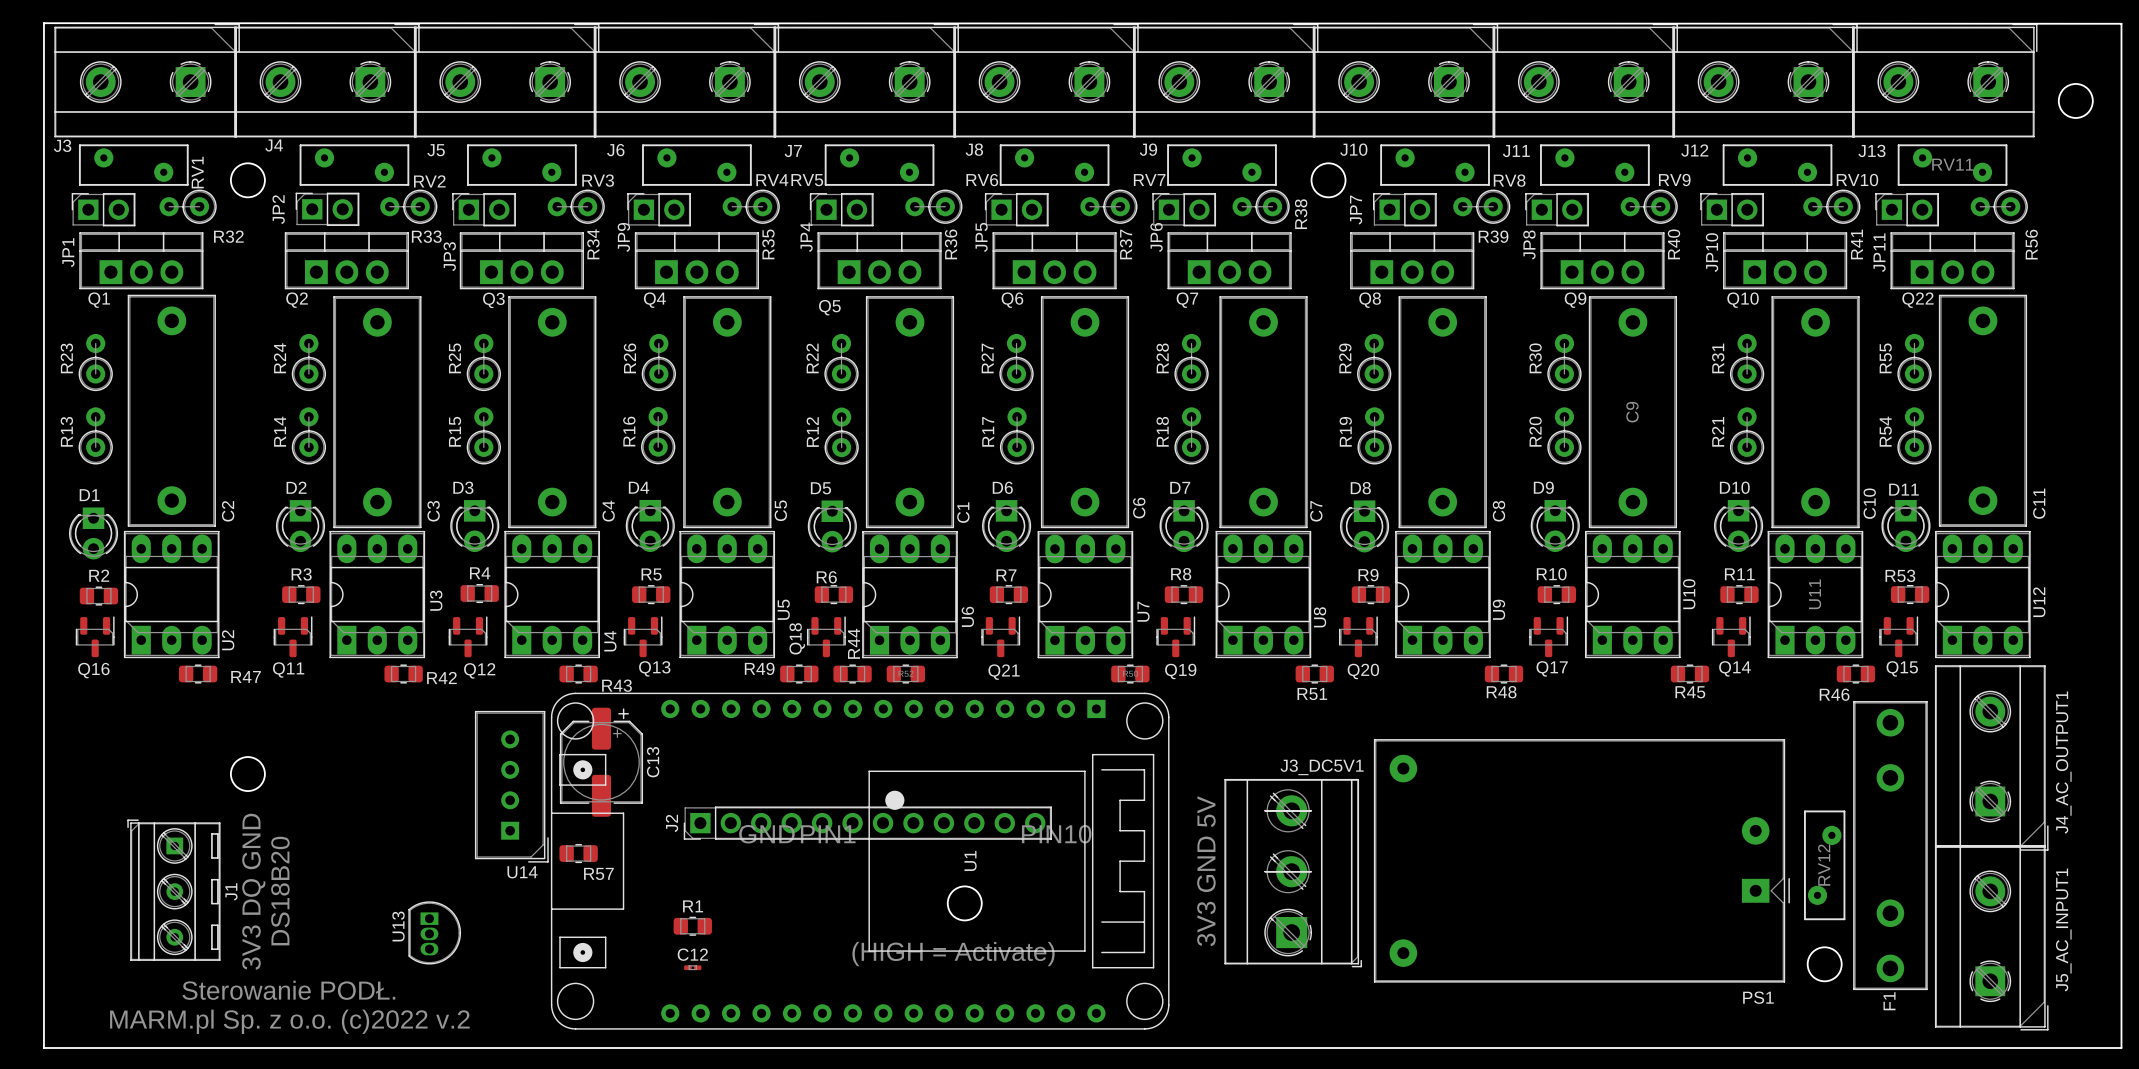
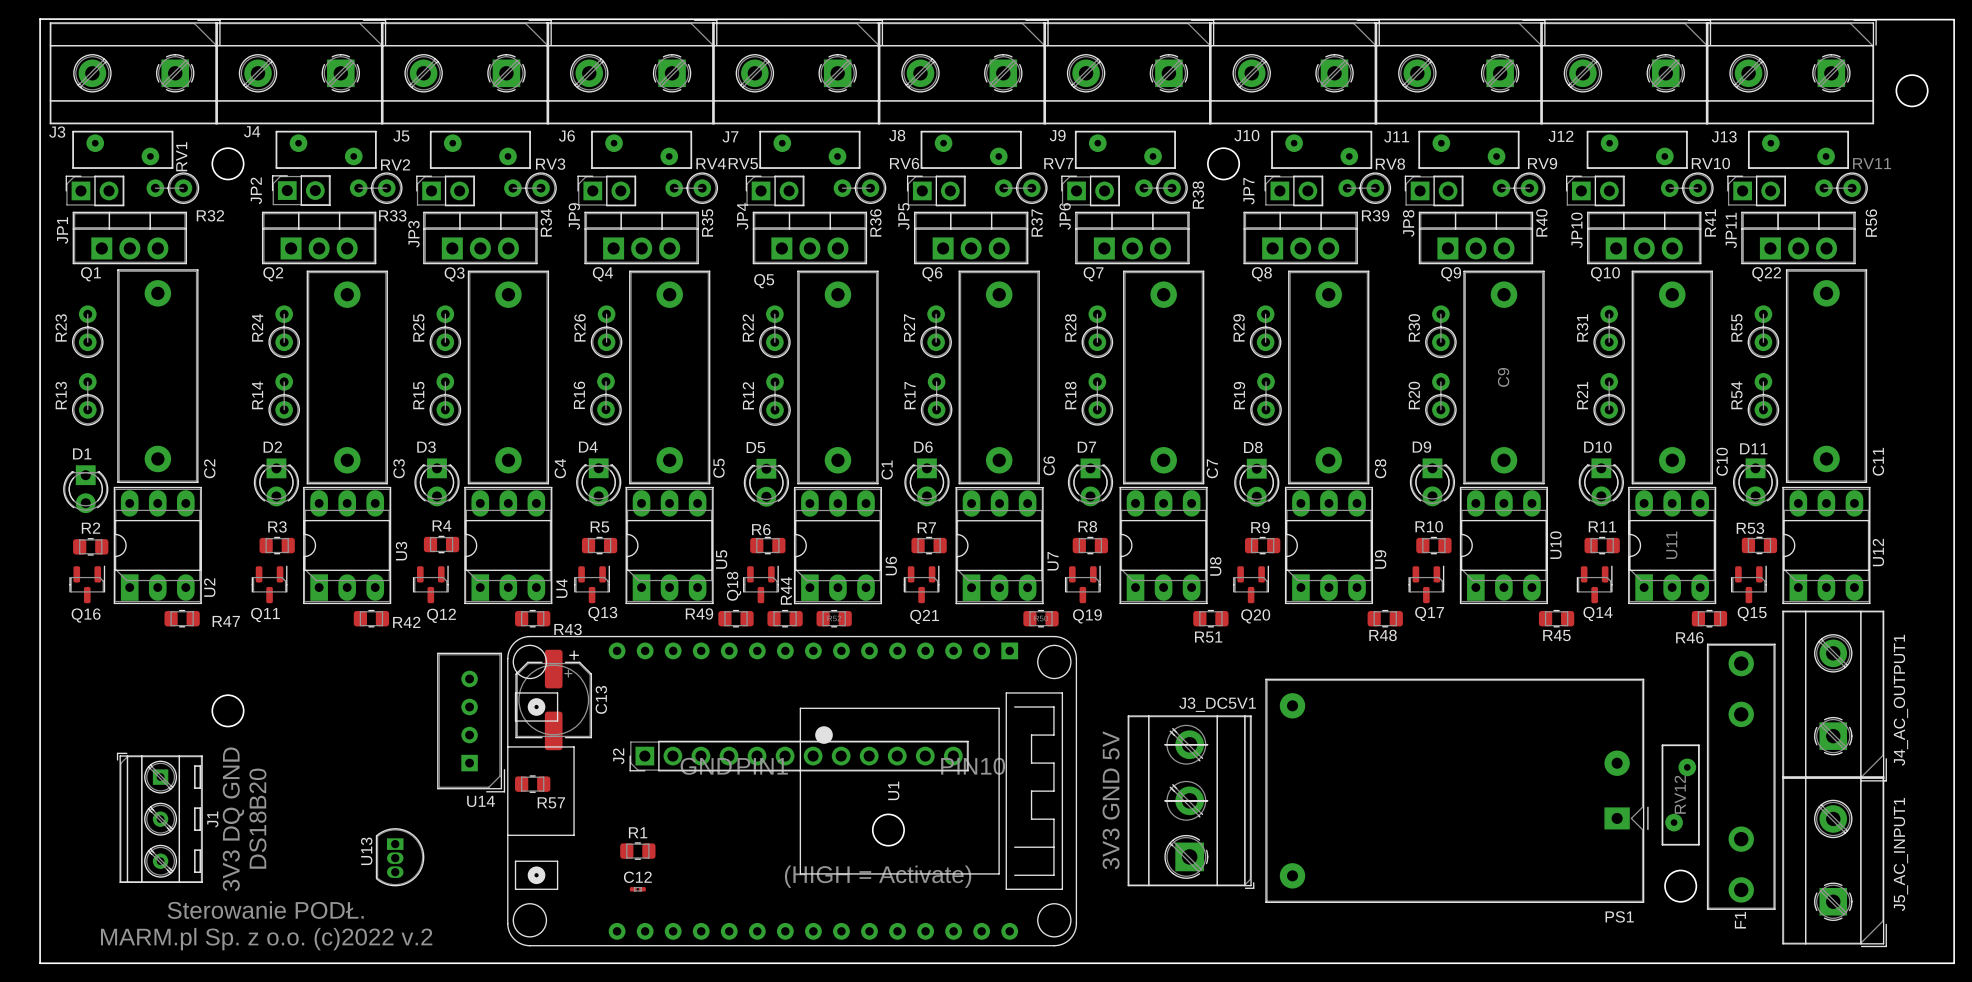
RV11 name position: RV11 (1952, 164) -> RV11 (1872, 163)

